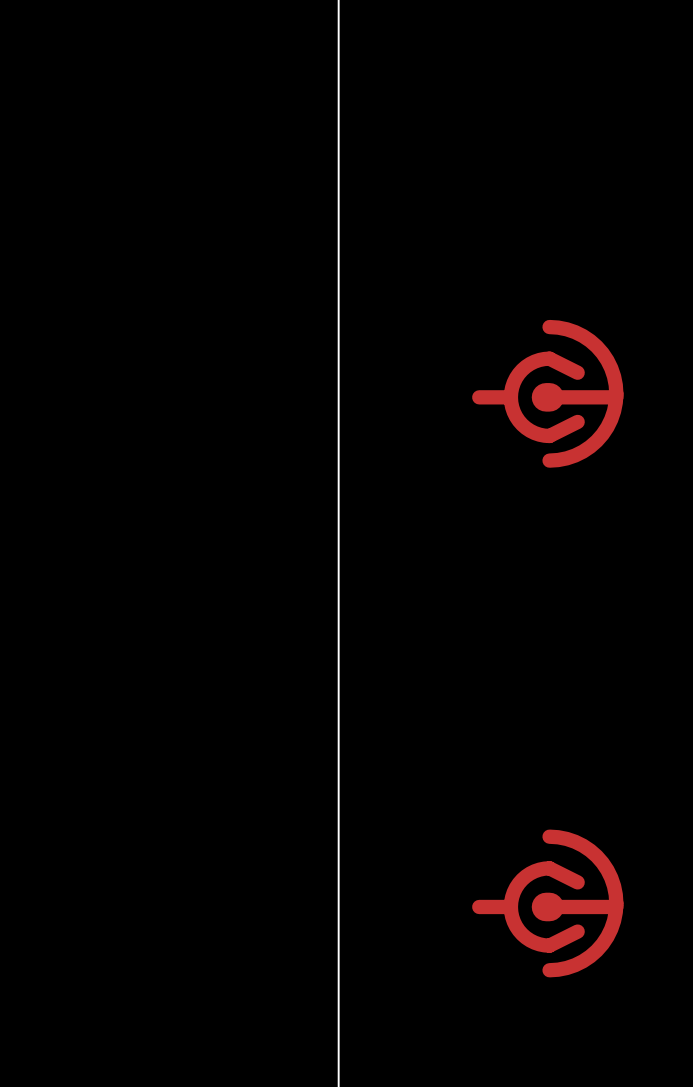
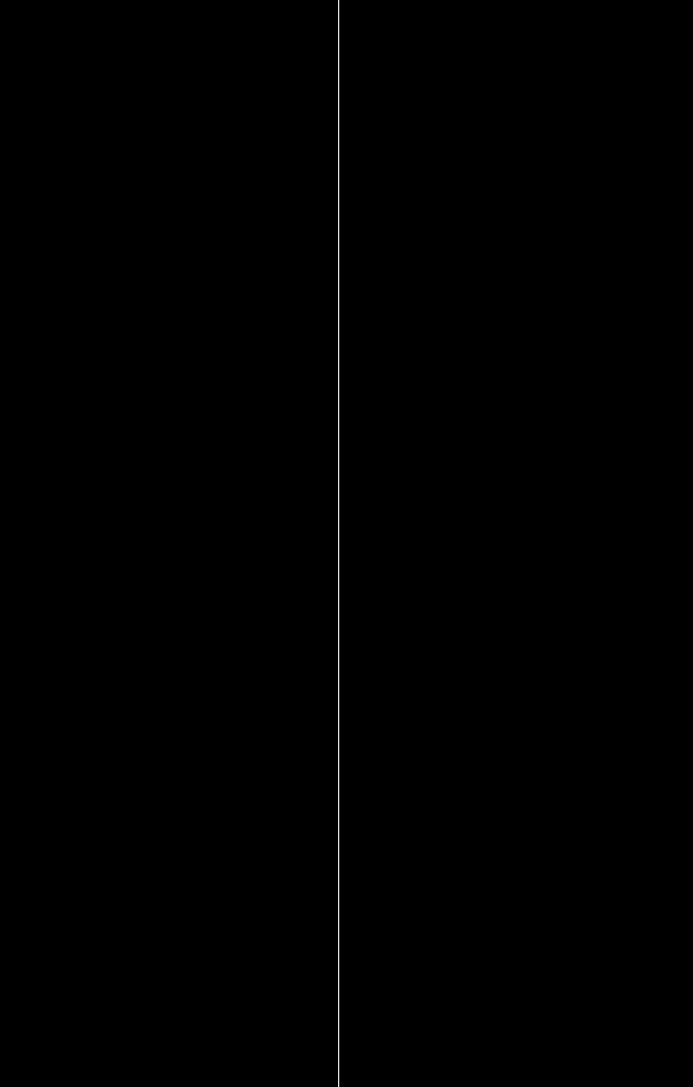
part: (547, 393) -> none
part: (547, 903) -> none

